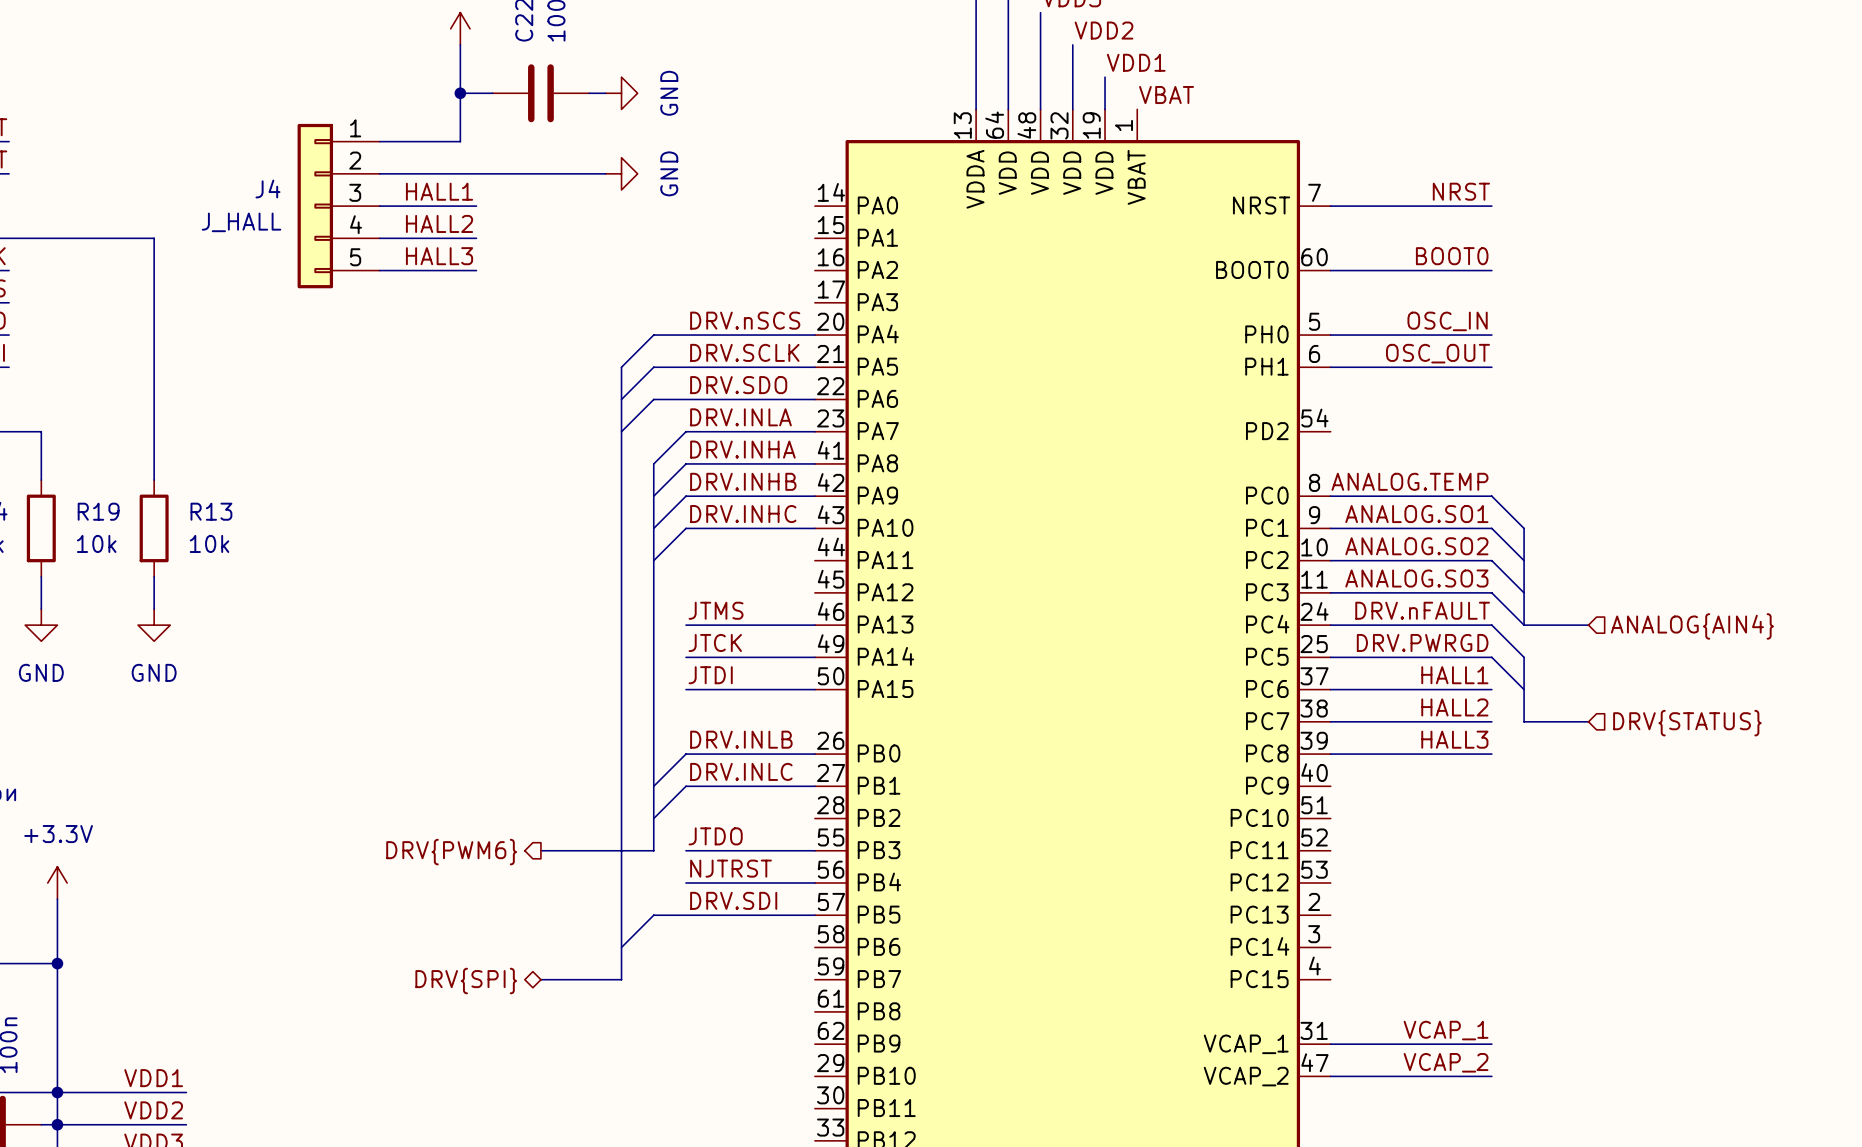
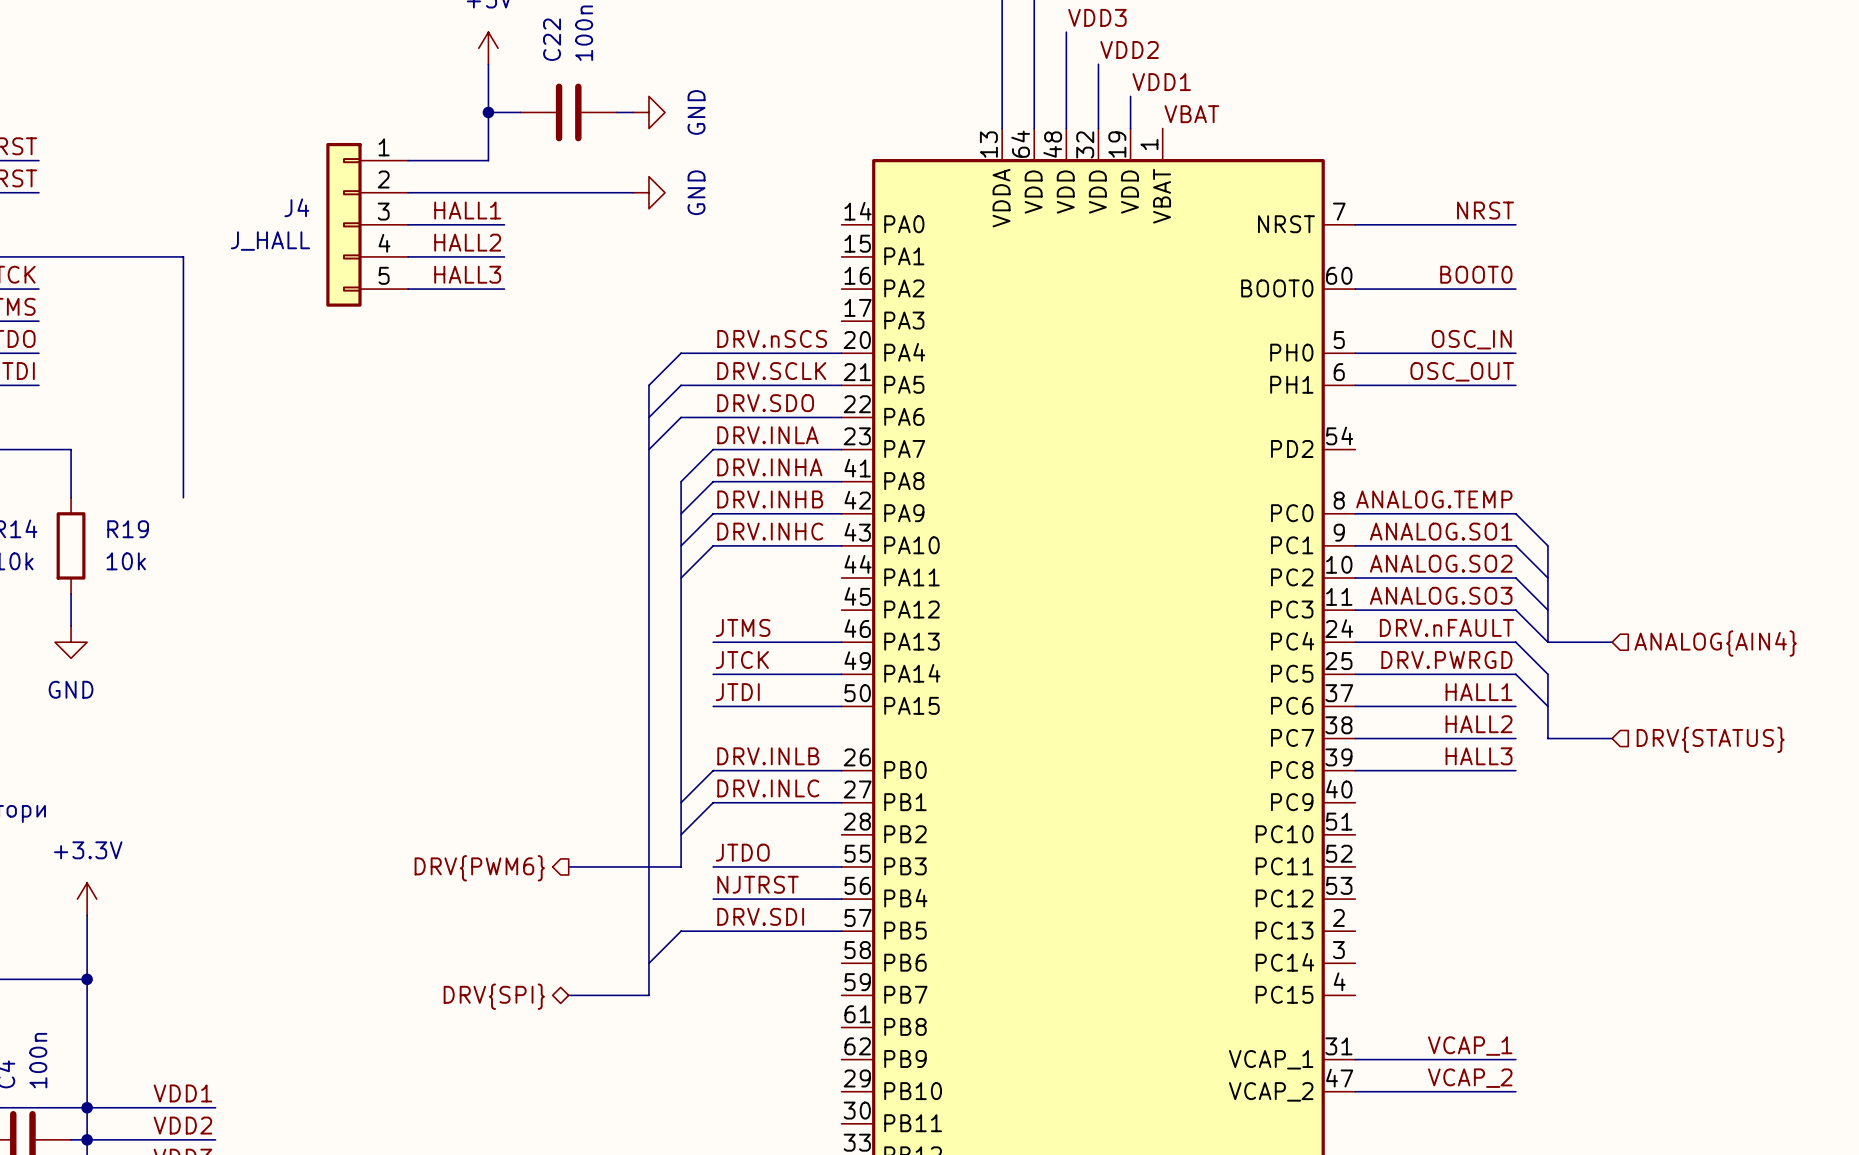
R13: 10k (154, 528) -> none
wire: (154, 576) (154, 609) -> none
power symbol: GND (154, 625) -> none

